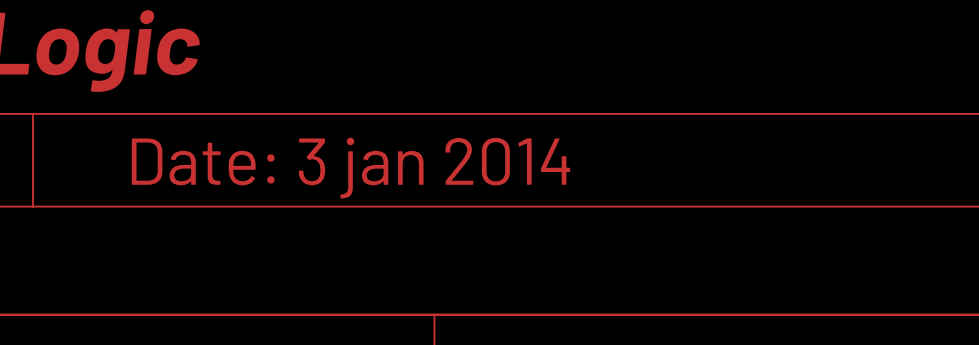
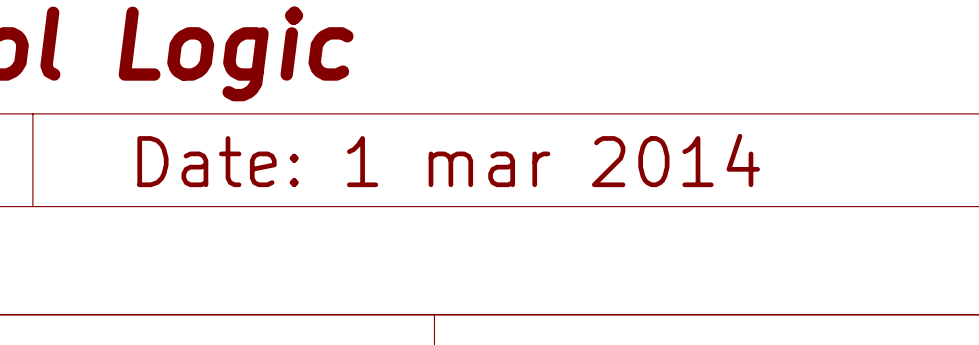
title block: Date: 3 jan 2014 (351, 168) -> Date: 1 mar 2014 (448, 160)

